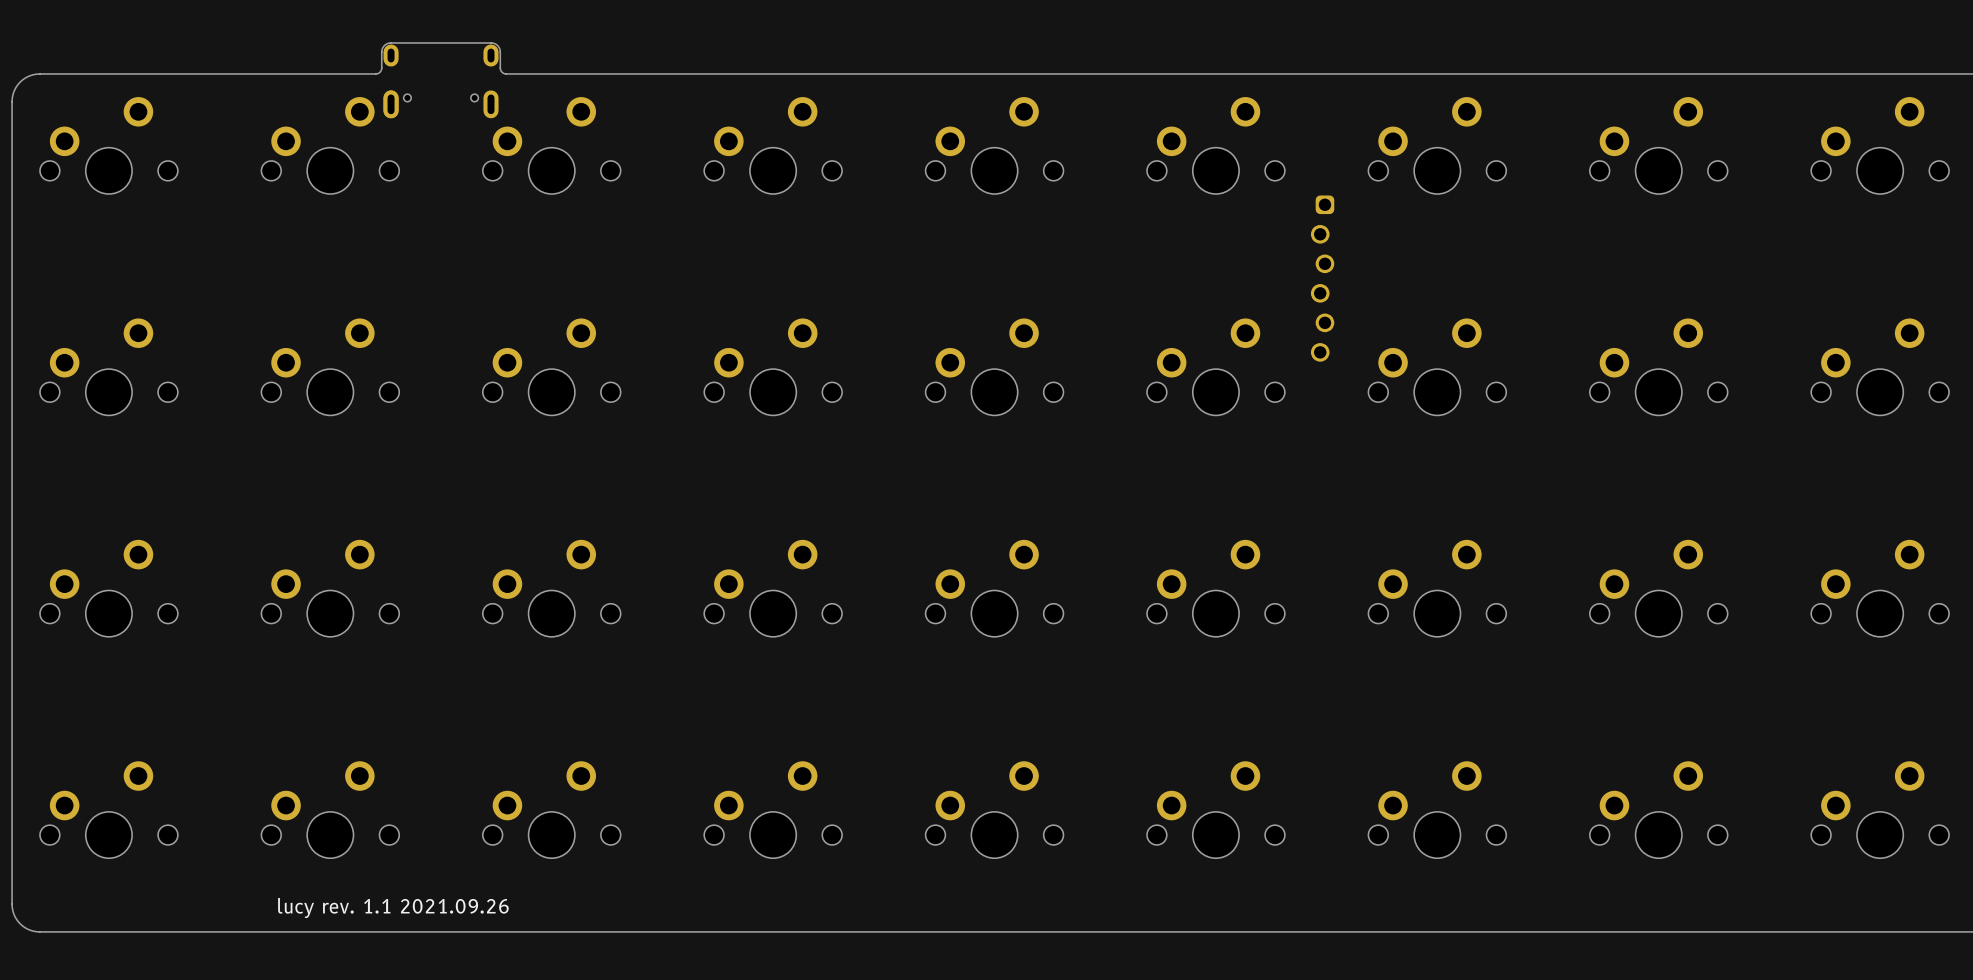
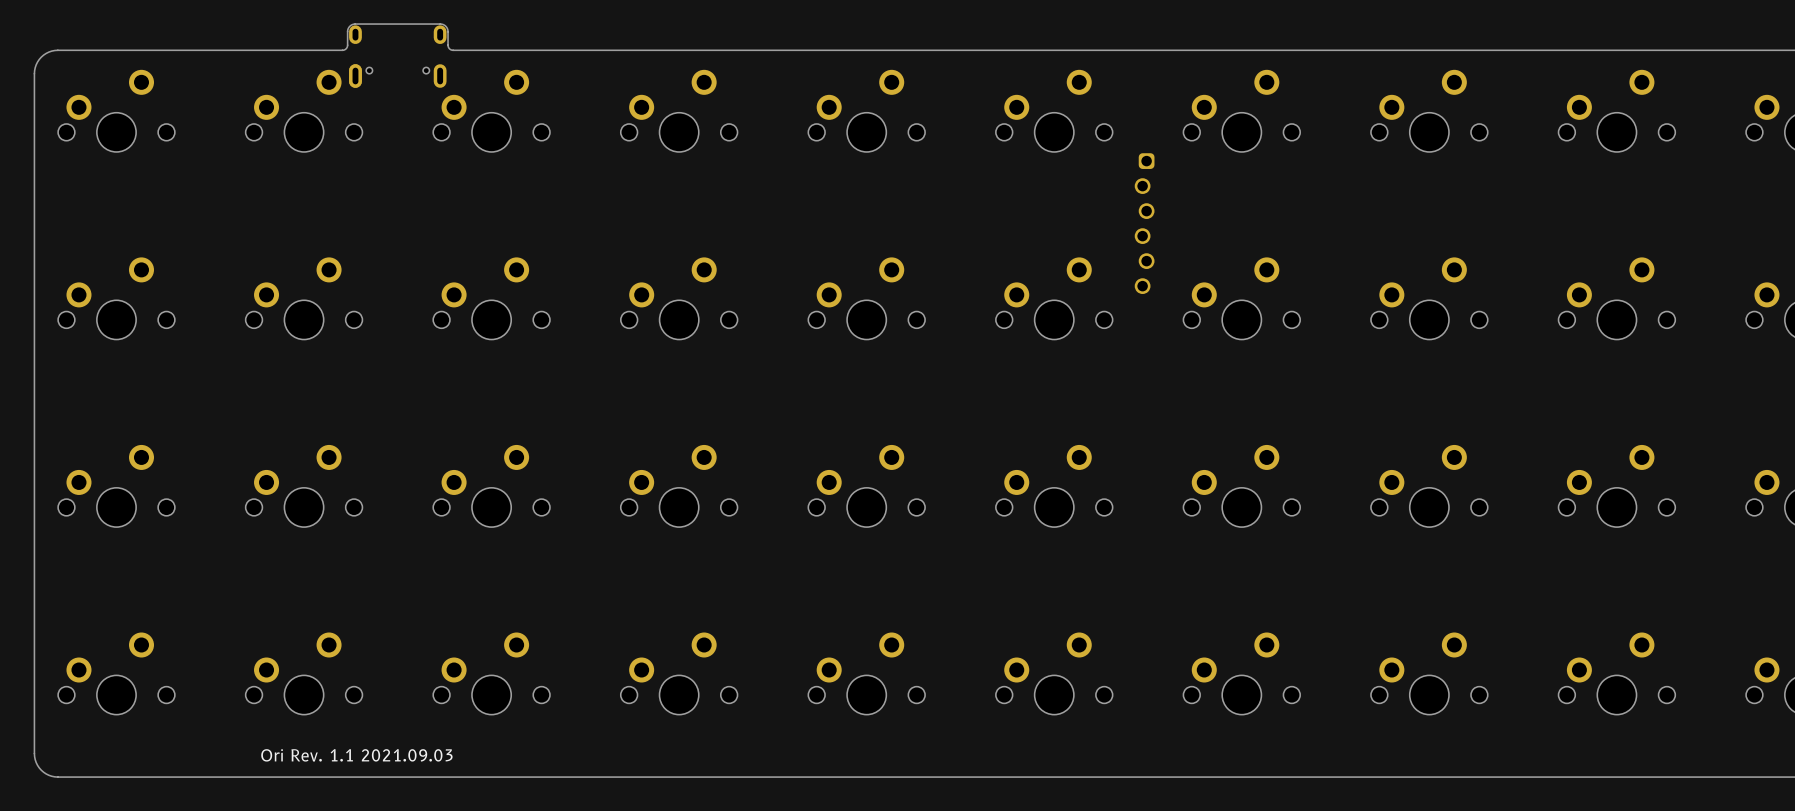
text: lucy rev. 1.1 2021.09.26 (393, 908) -> Ori Rev. 1.1 2021.09.03 (356, 755)

